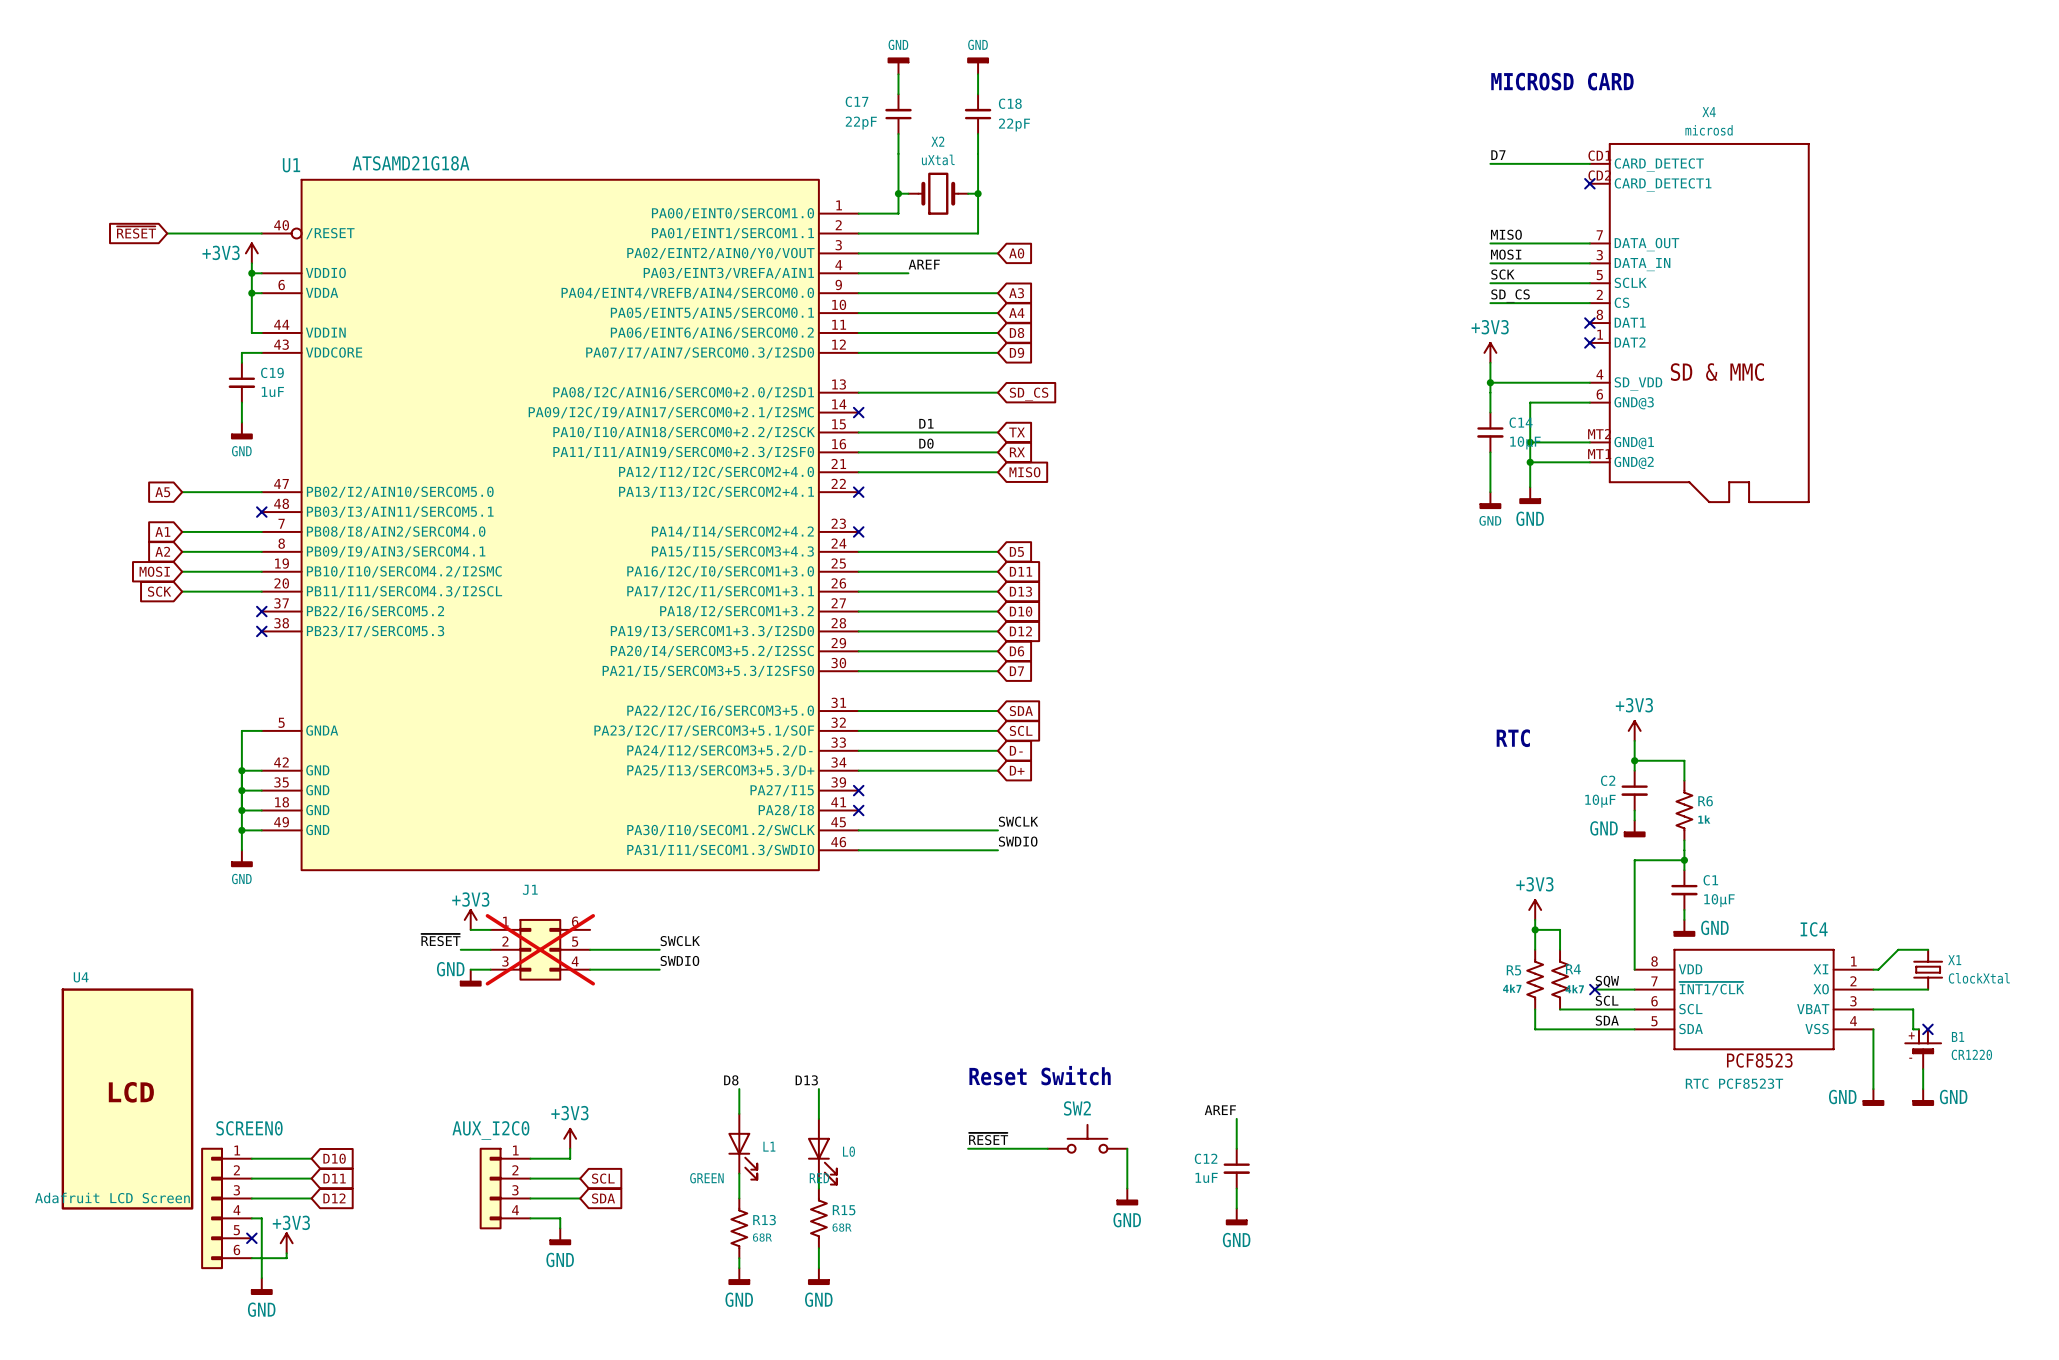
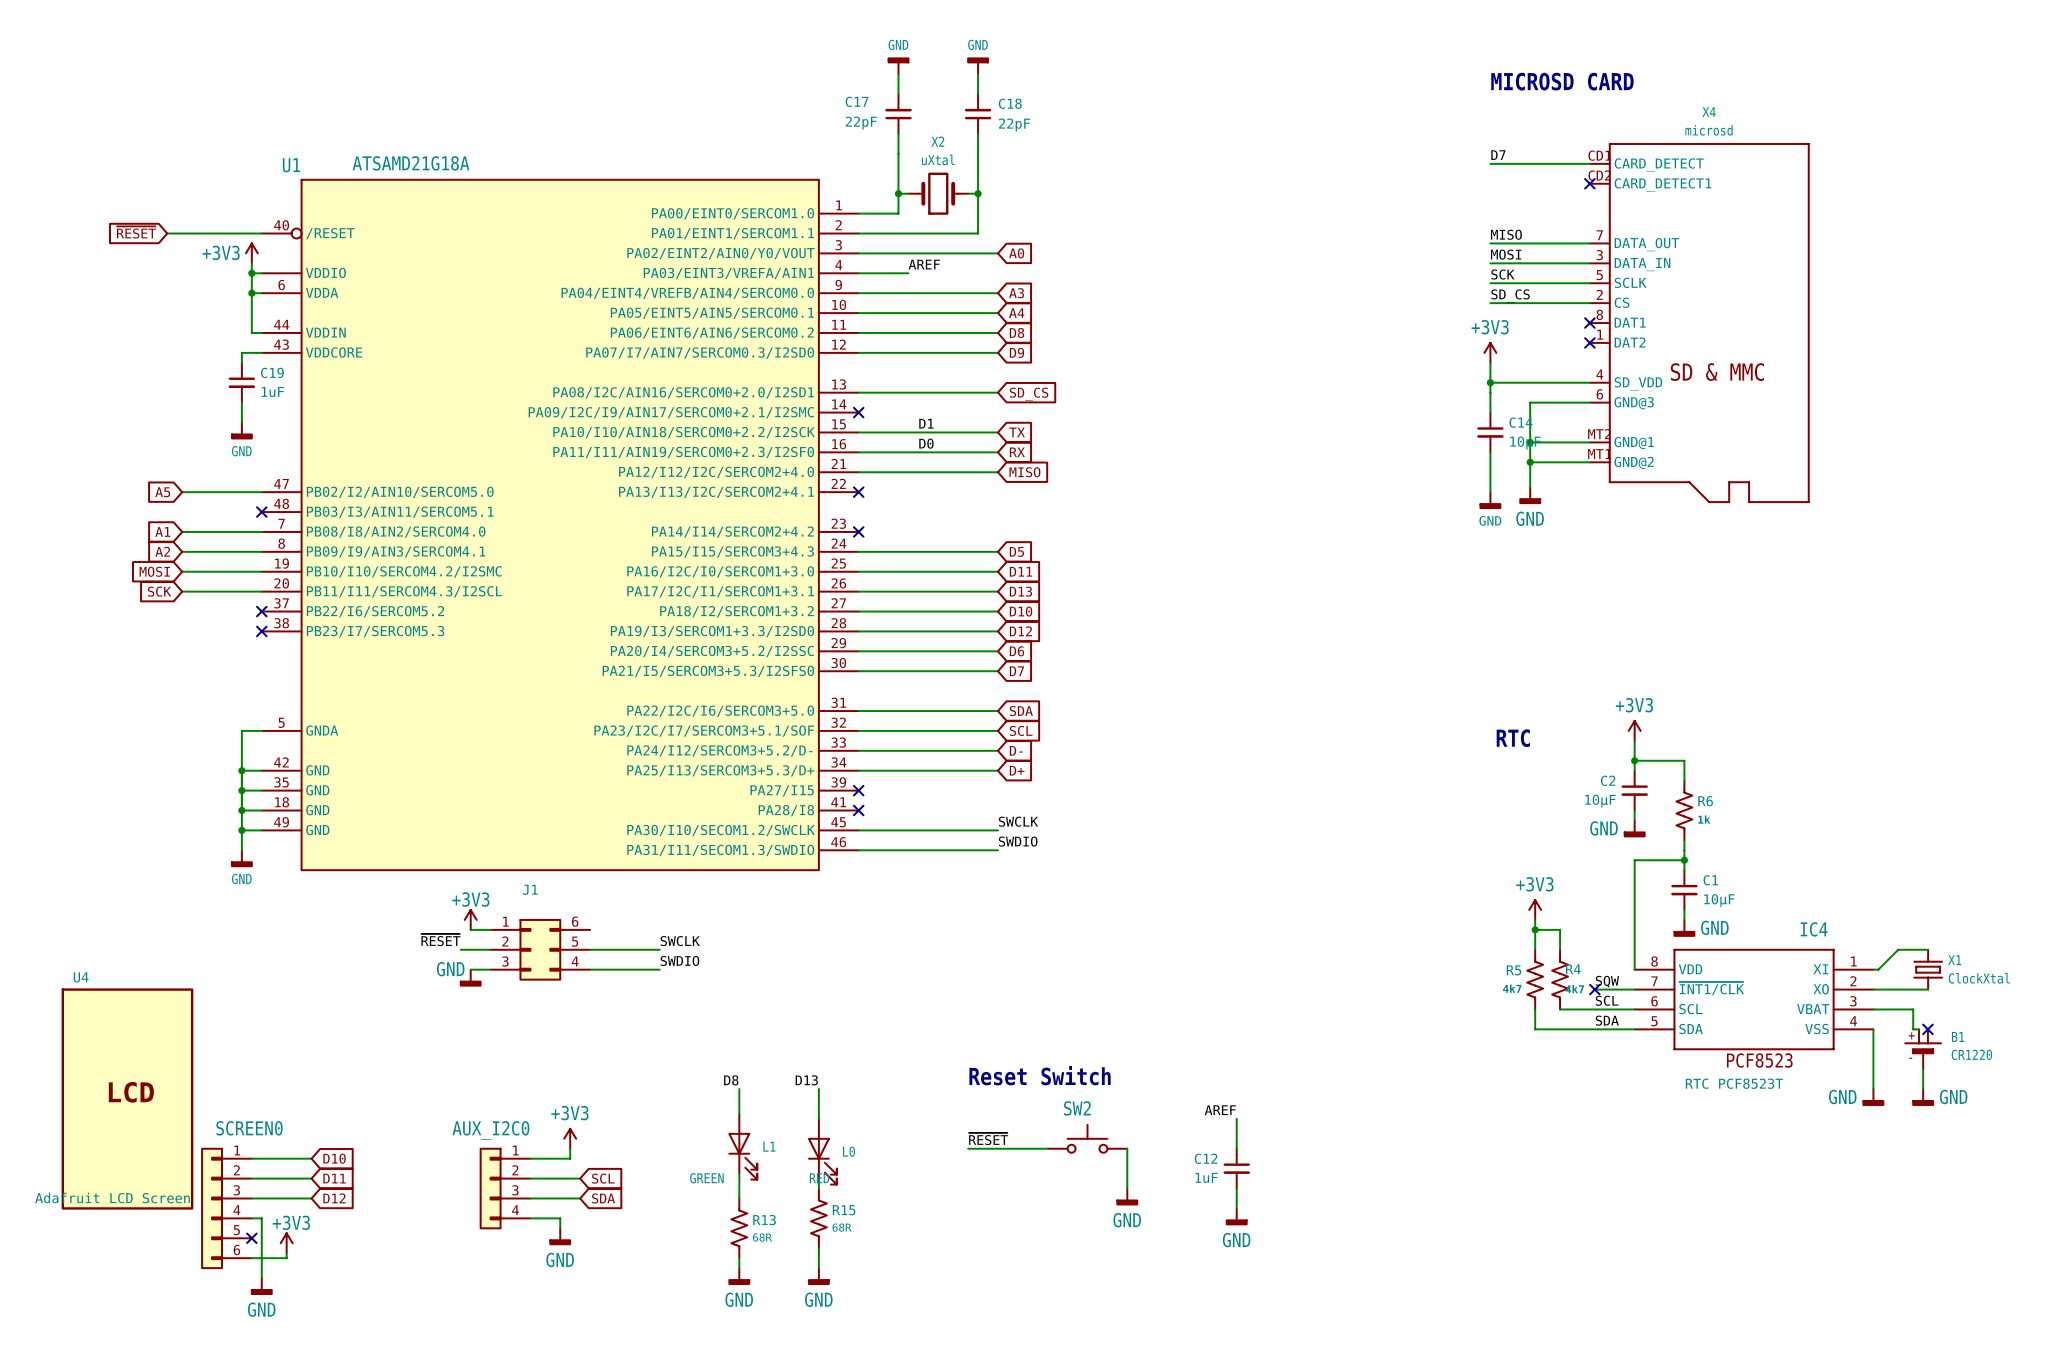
J1 do-not-place cross: (540, 949) -> none

